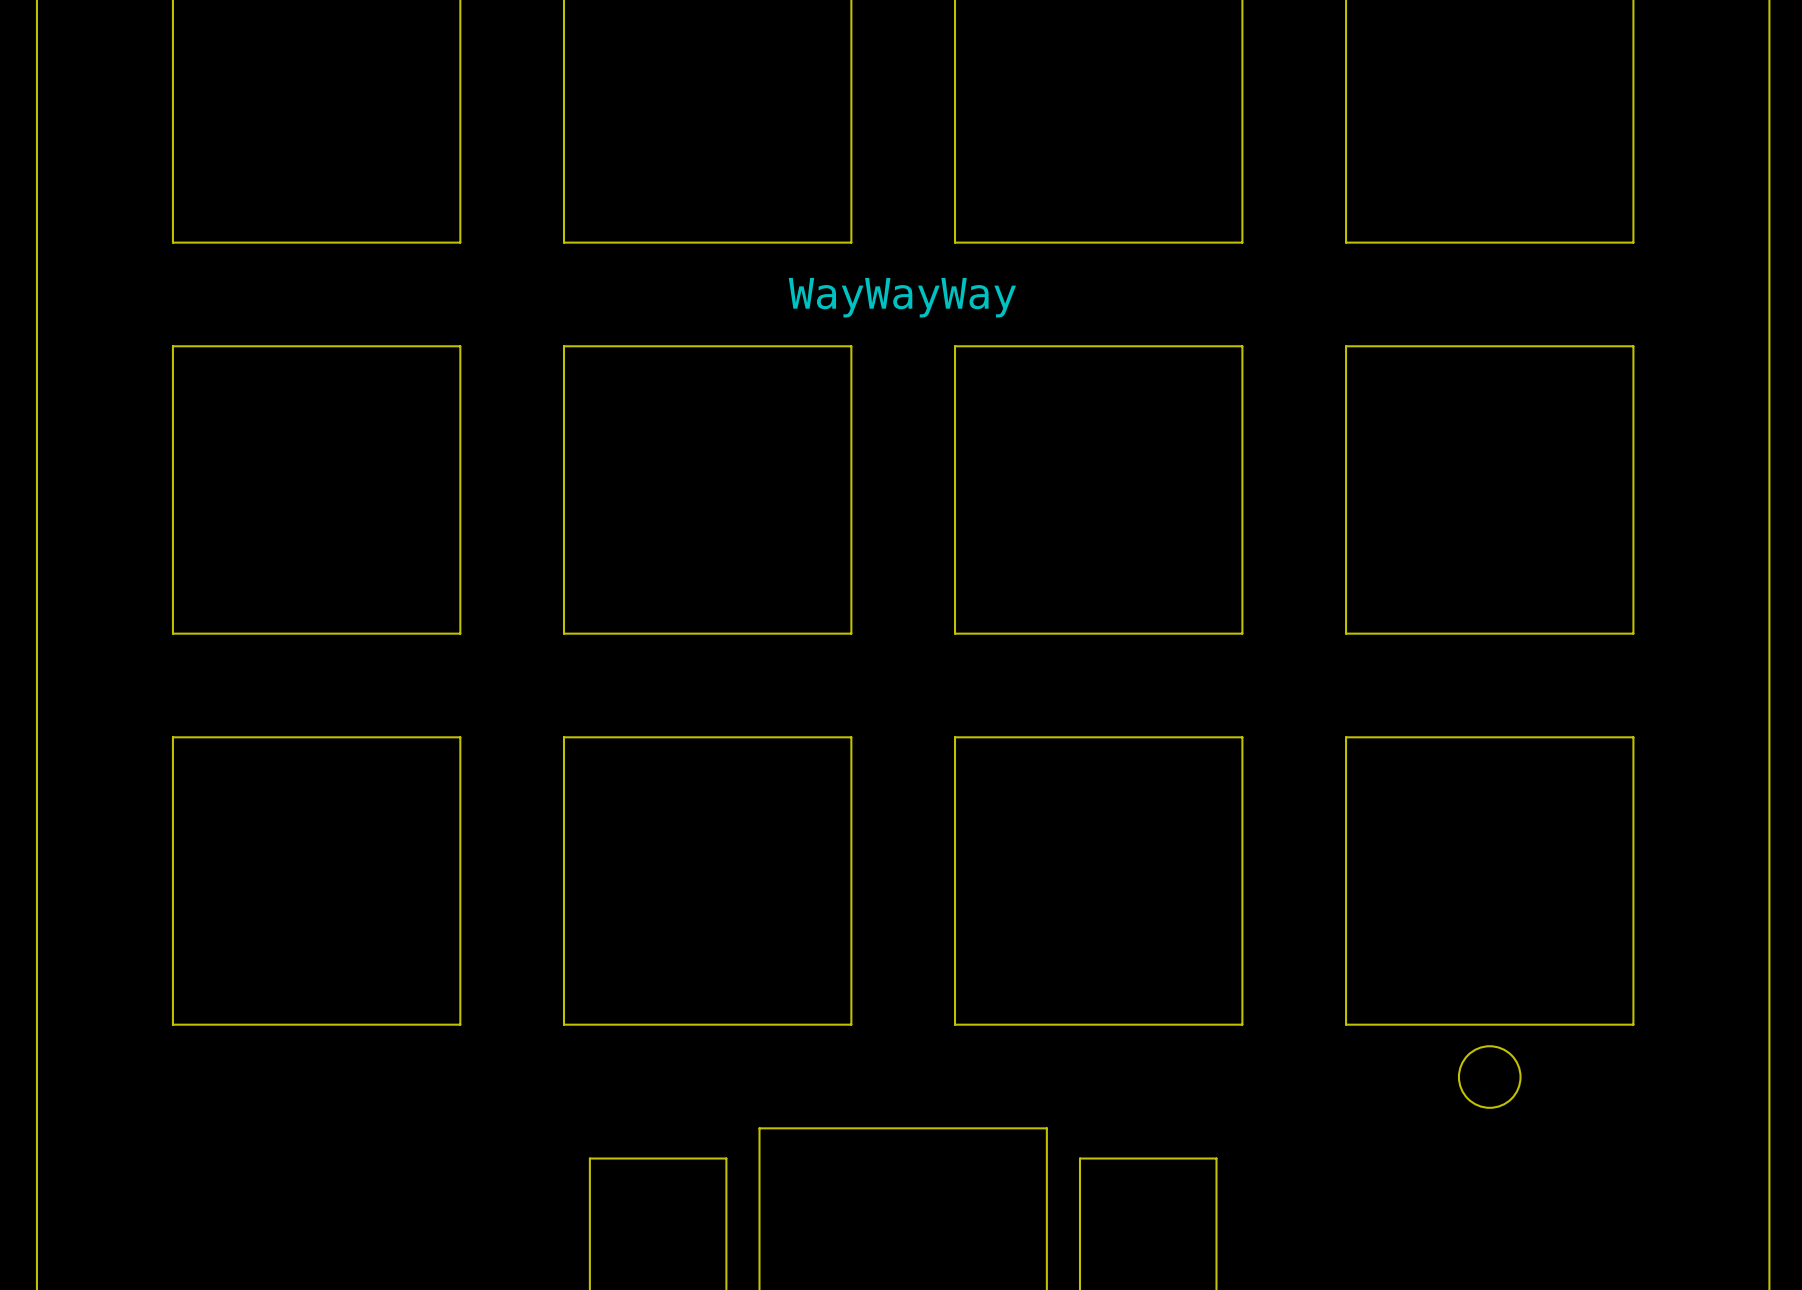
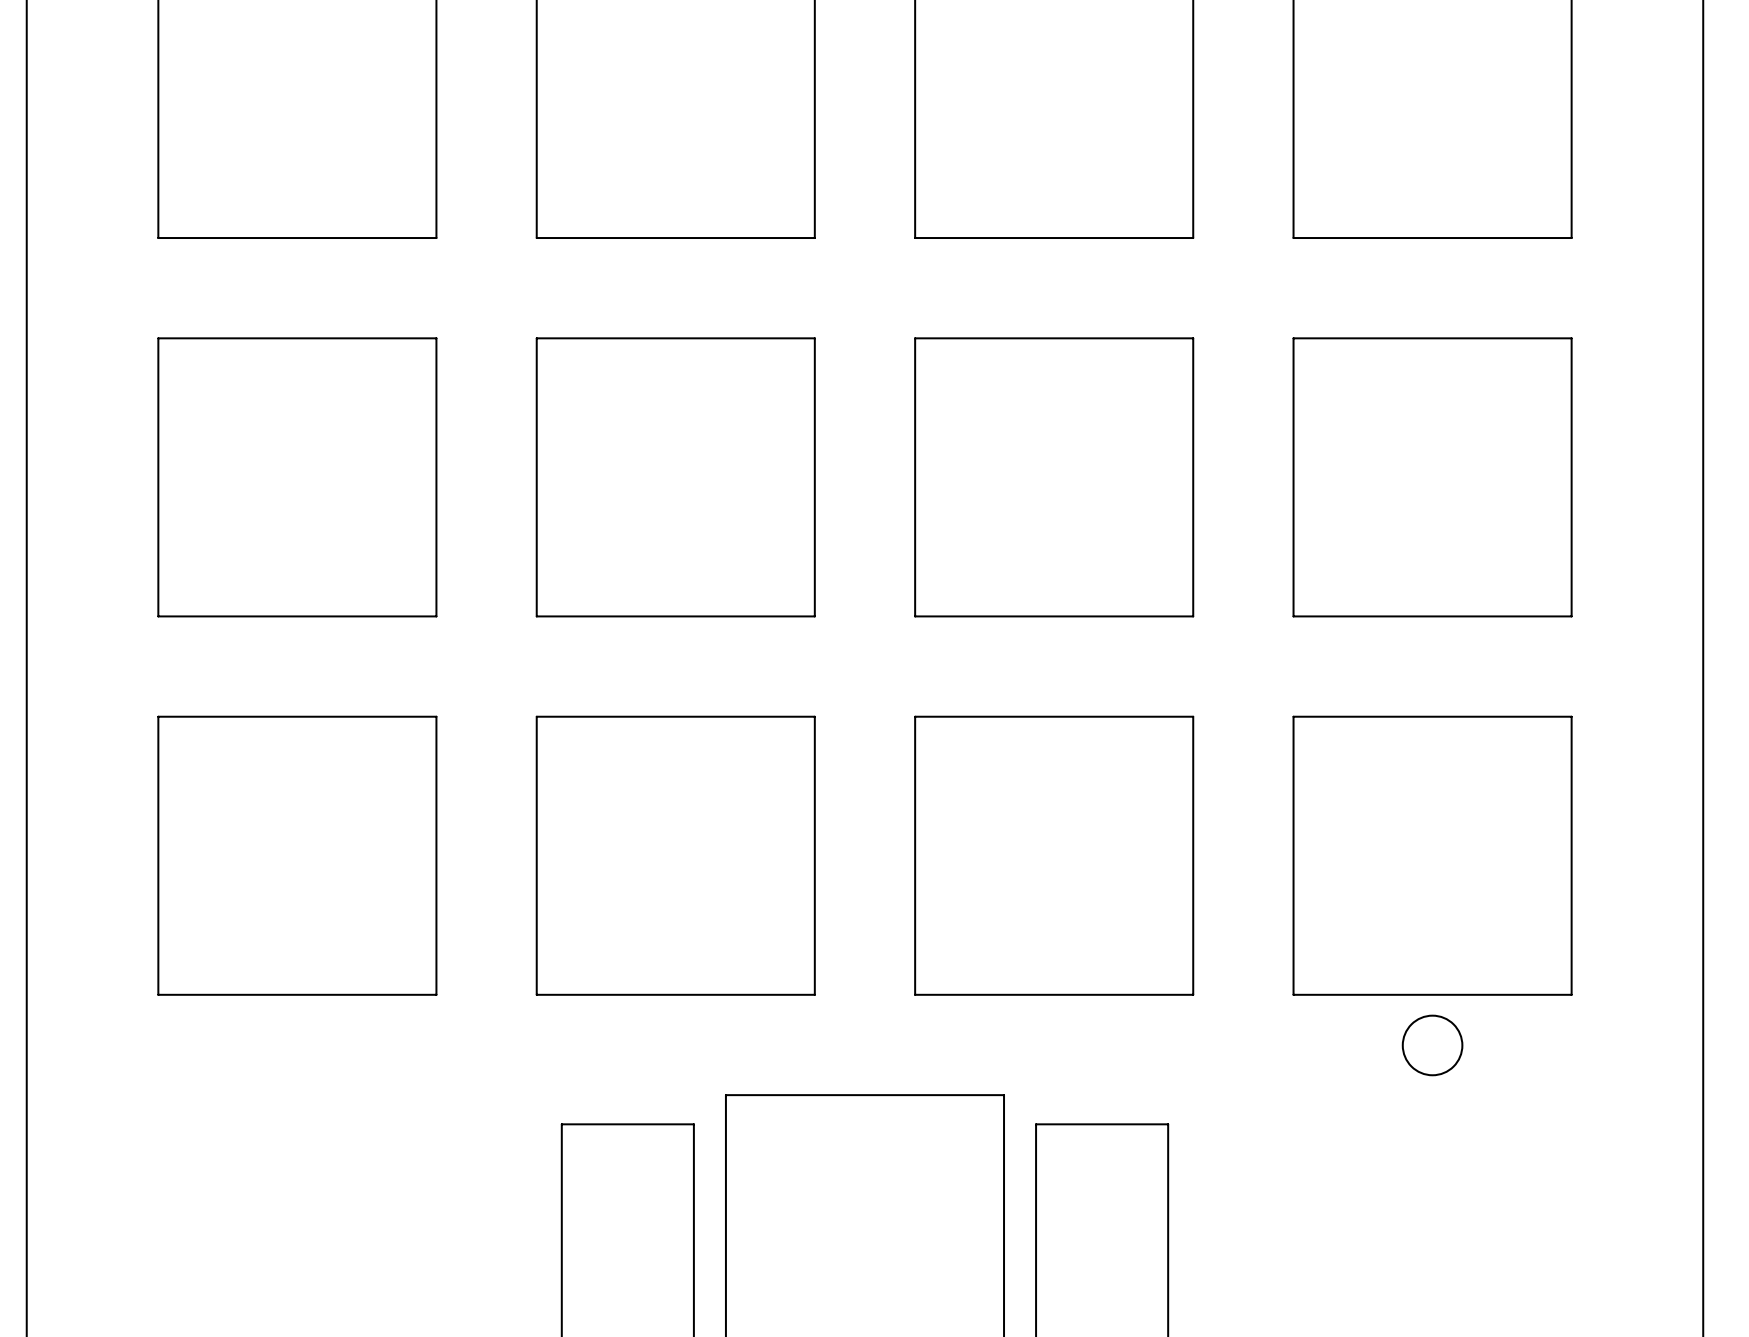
text: WayWayWay (902, 297) -> none

